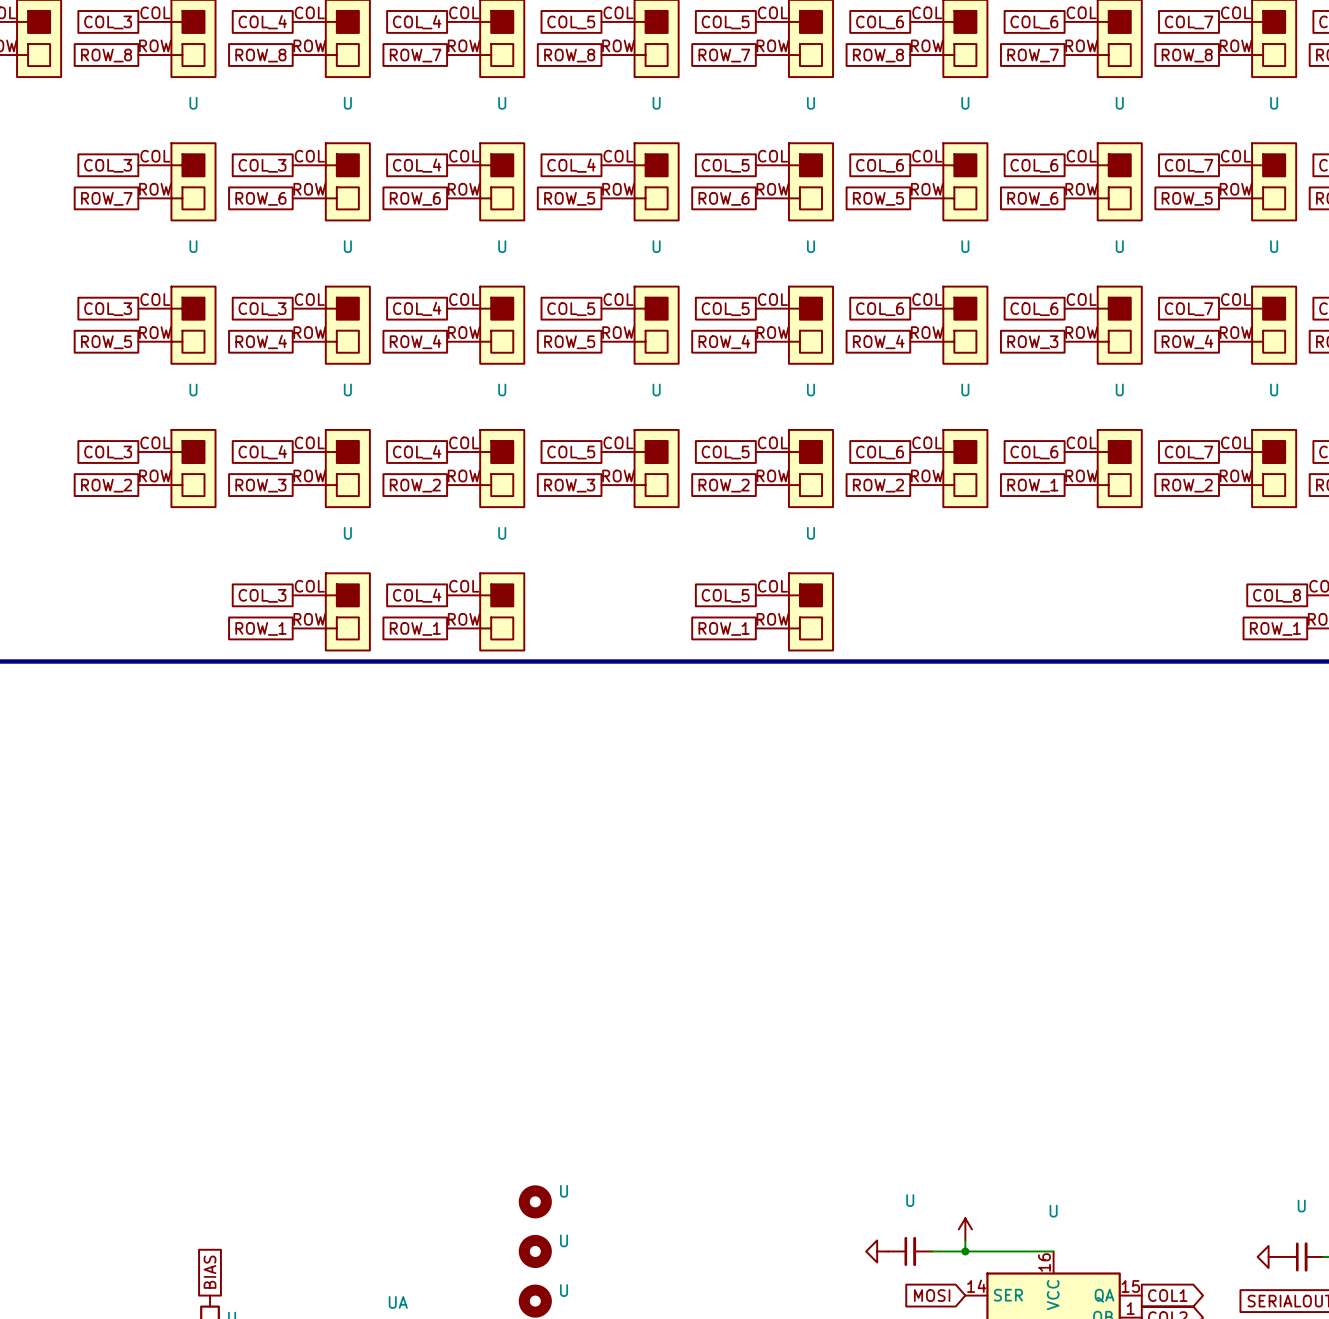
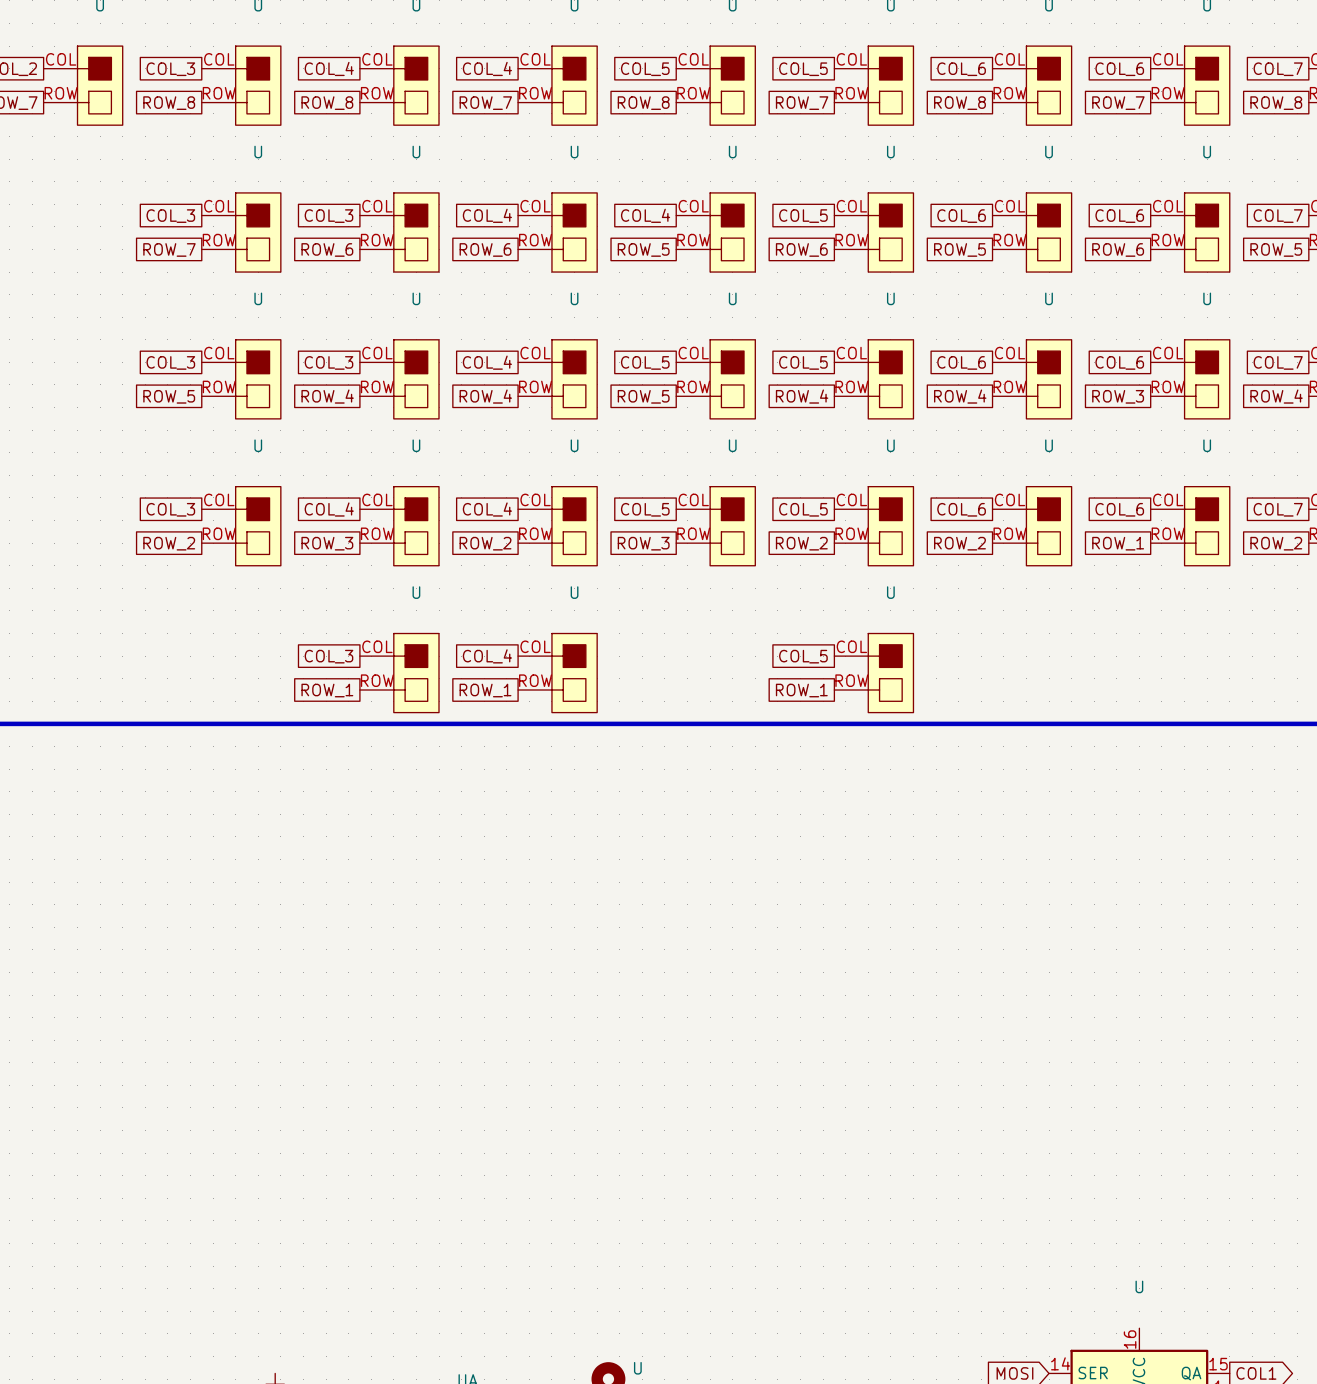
U: (535, 1201) -> none
power symbol: (965, 1229) -> none
wire: (965, 1240) (965, 1251) -> none
U: (535, 1251) -> none
power symbol: (877, 1251) -> none
U: (910, 1251) -> none
wire: (932, 1251) (1053, 1251) -> none
junction: (965, 1251) -> none
global label: BIAS (210, 1272) -> none

